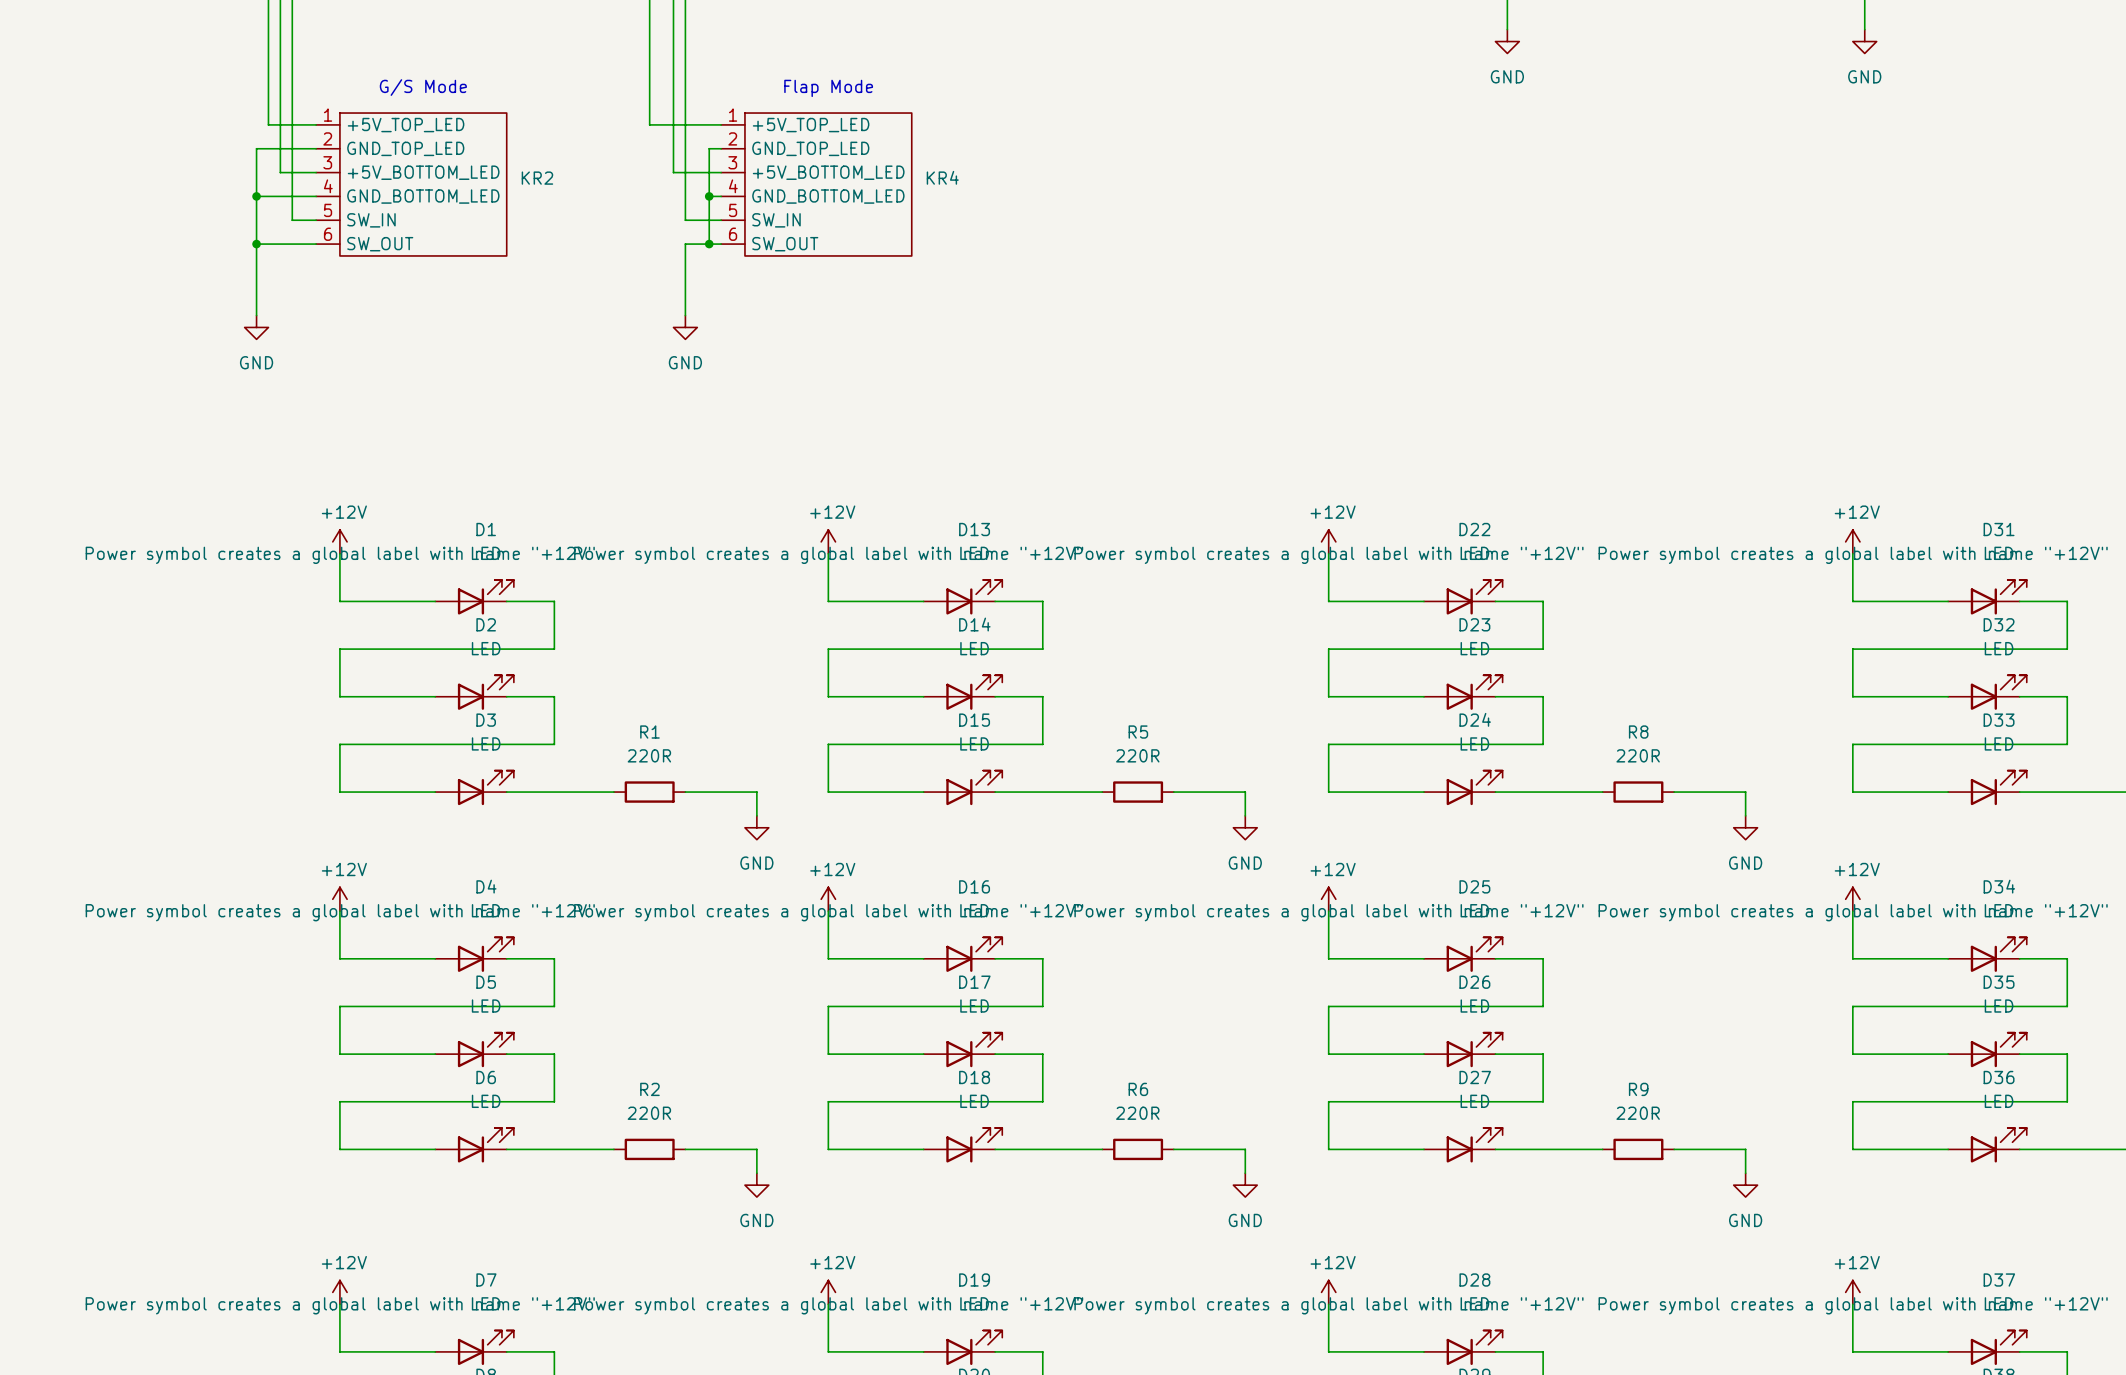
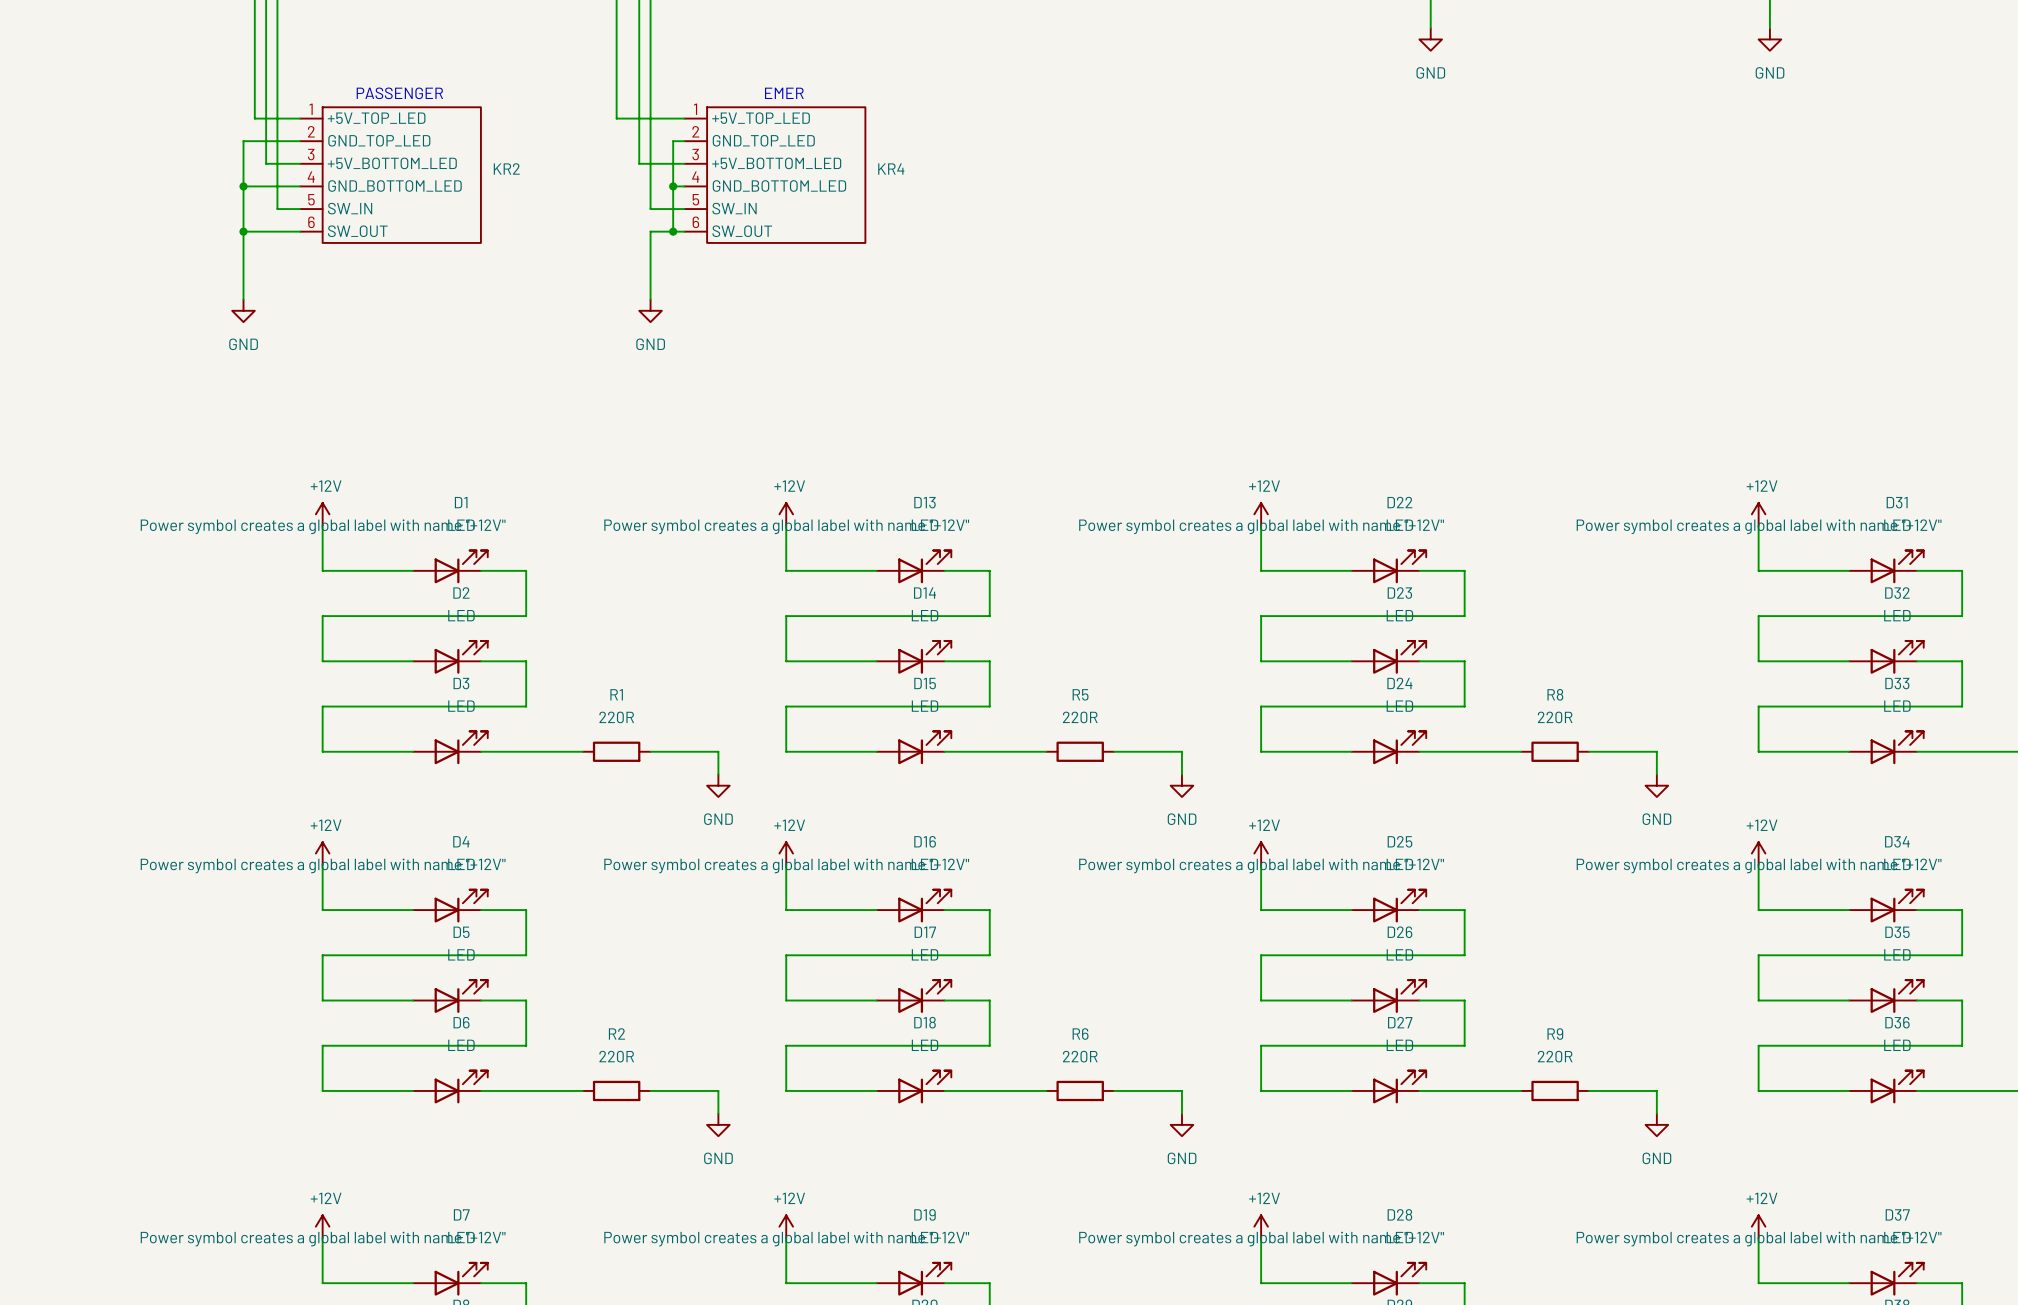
text: G/S Mode (423, 87) -> none
text: Flap Mode (828, 88) -> none
text: none -> PASSENGER (399, 93)
text: none -> EMER (784, 93)

